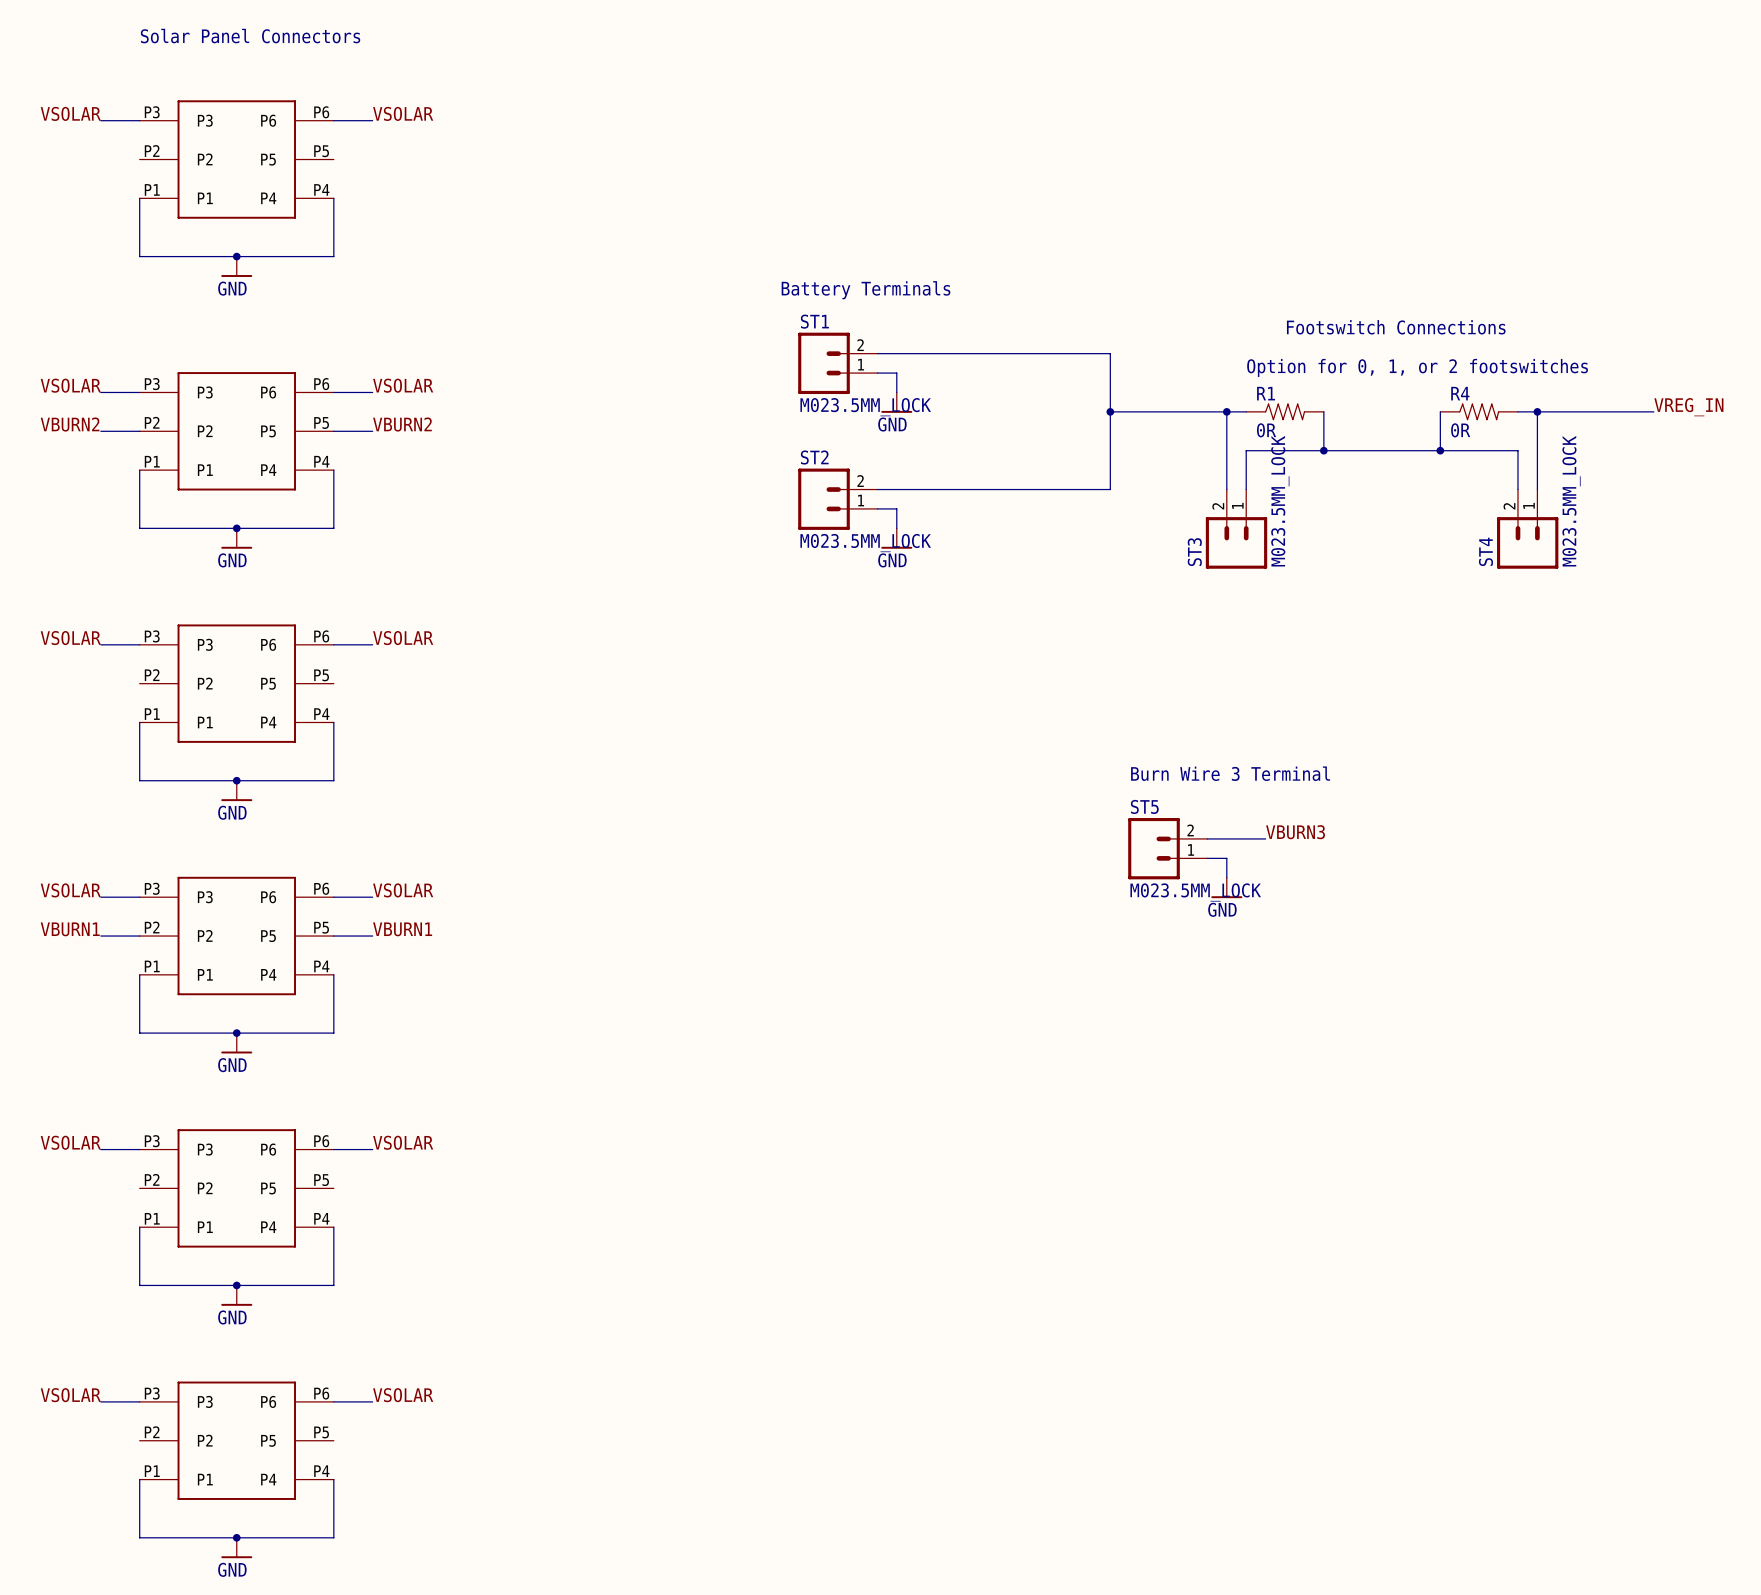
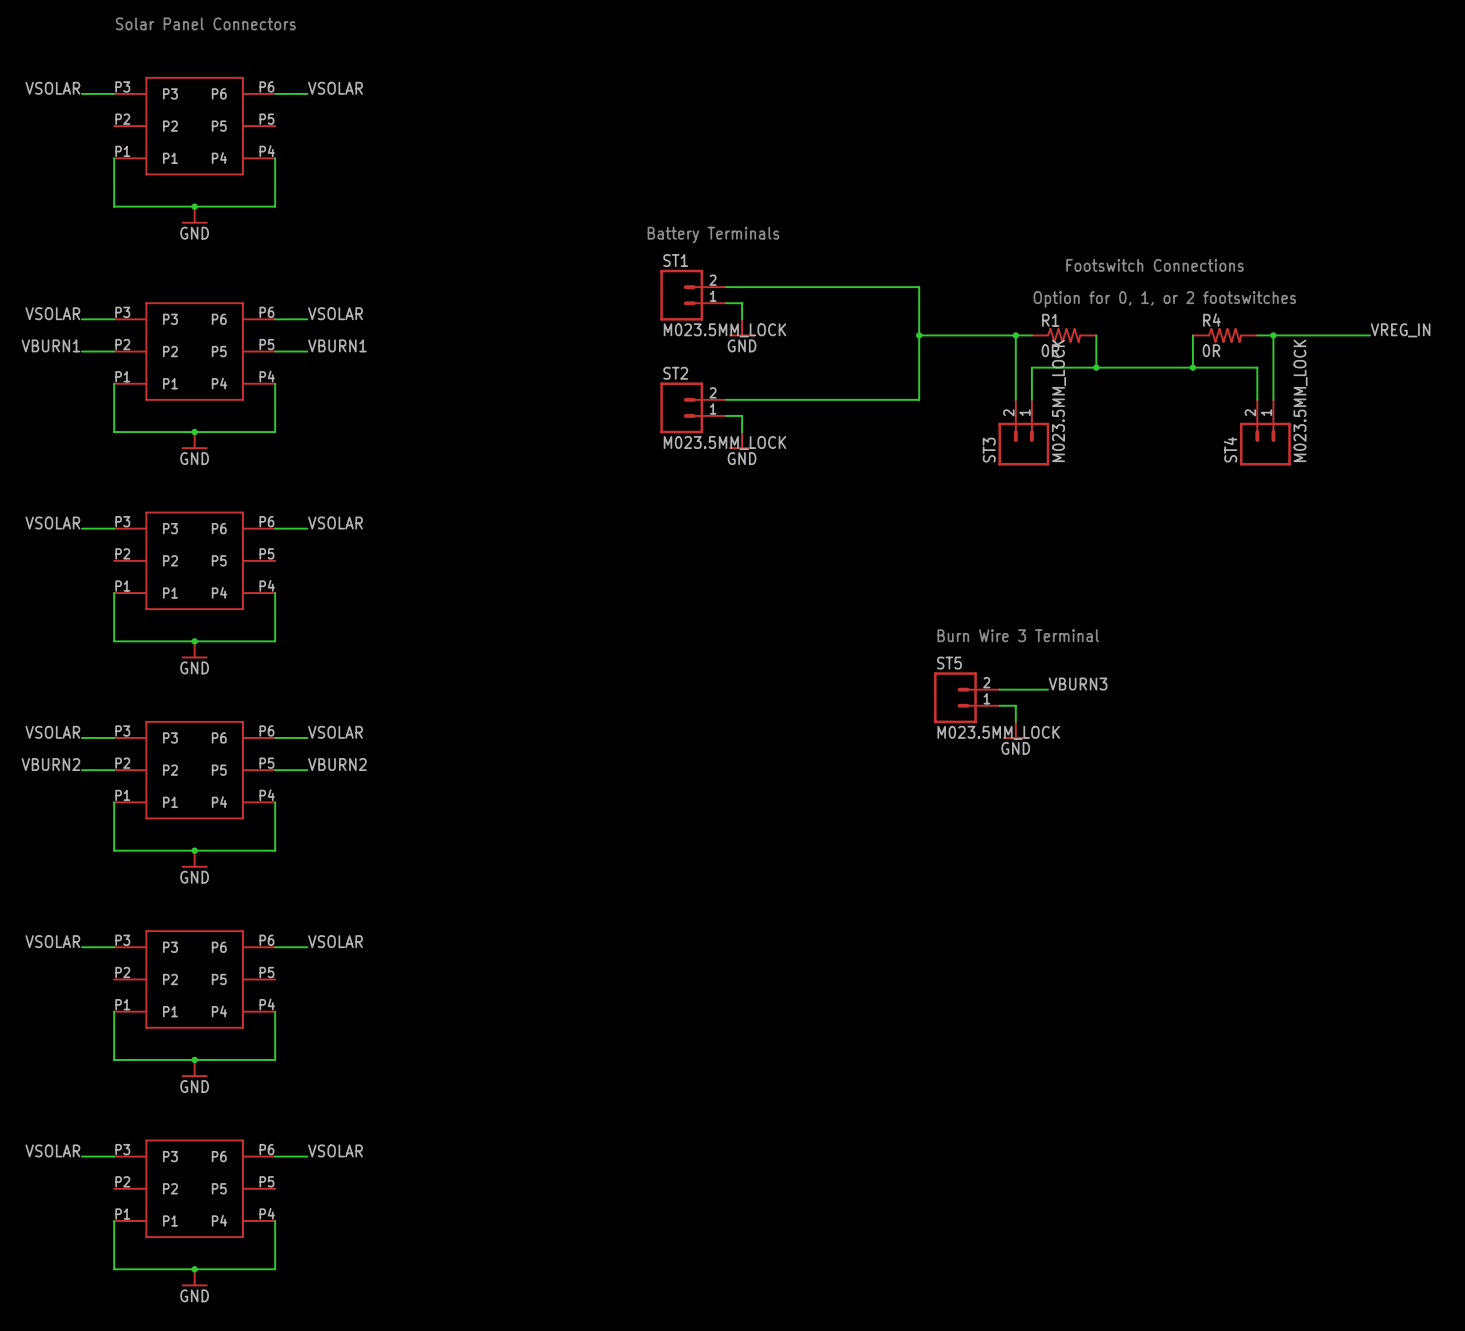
label: VBURN2 (70, 424) -> VBURN1 (50, 345)
label: VBURN2 (402, 424) -> VBURN1 (337, 345)
label: VBURN1 (70, 929) -> VBURN2 (50, 764)
label: VBURN1 (402, 929) -> VBURN2 (337, 764)

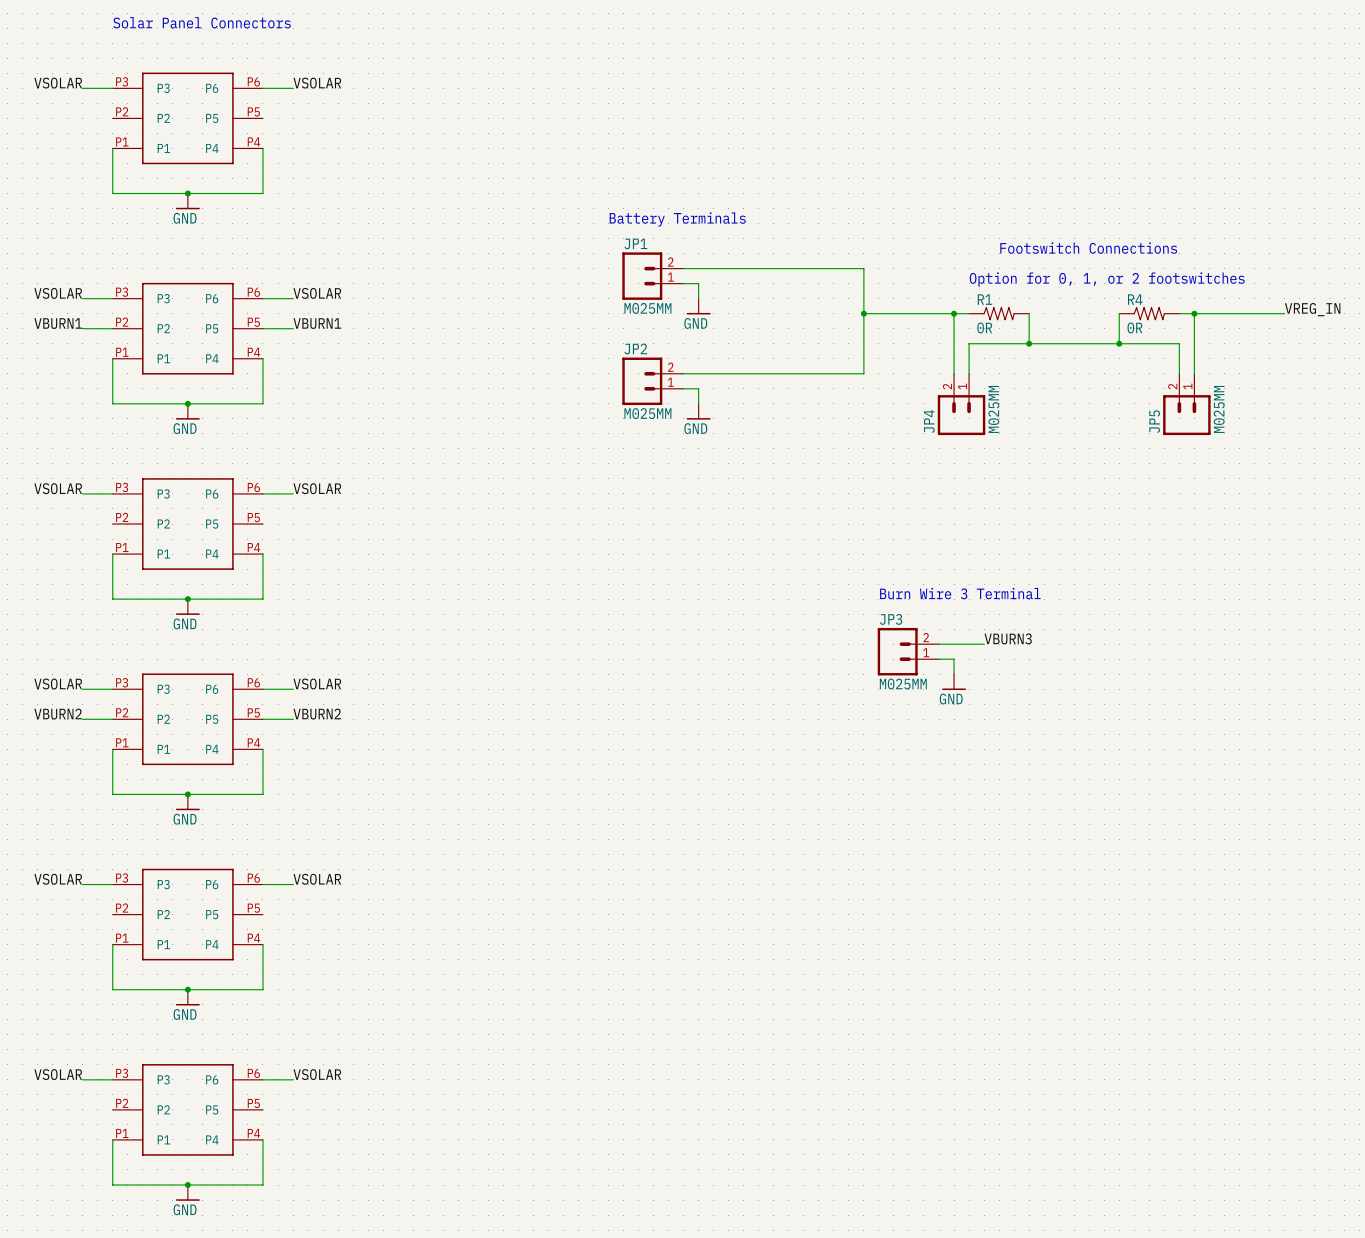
ST1 name: ST1 (675, 260) -> JP1 (635, 243)
ST1 value: M023.5MM_LOCK (724, 330) -> M025MM (647, 308)
ST2 name: ST2 (675, 373) -> JP2 (635, 348)
ST3 value: M023.5MM_LOCK (1059, 400) -> M025MM (993, 409)
ST4 value: M023.5MM_LOCK (1300, 400) -> M025MM (1219, 409)
ST2 value: M023.5MM_LOCK (724, 443) -> M025MM (647, 413)
ST4 name: ST4 (1230, 449) -> JP5 (1154, 421)
ST3 name: ST3 (989, 450) -> JP4 (929, 421)
ST5 name: ST5 (949, 663) -> JP3 (891, 619)
ST5 value: M023.5MM_LOCK (998, 732) -> M025MM (903, 683)

